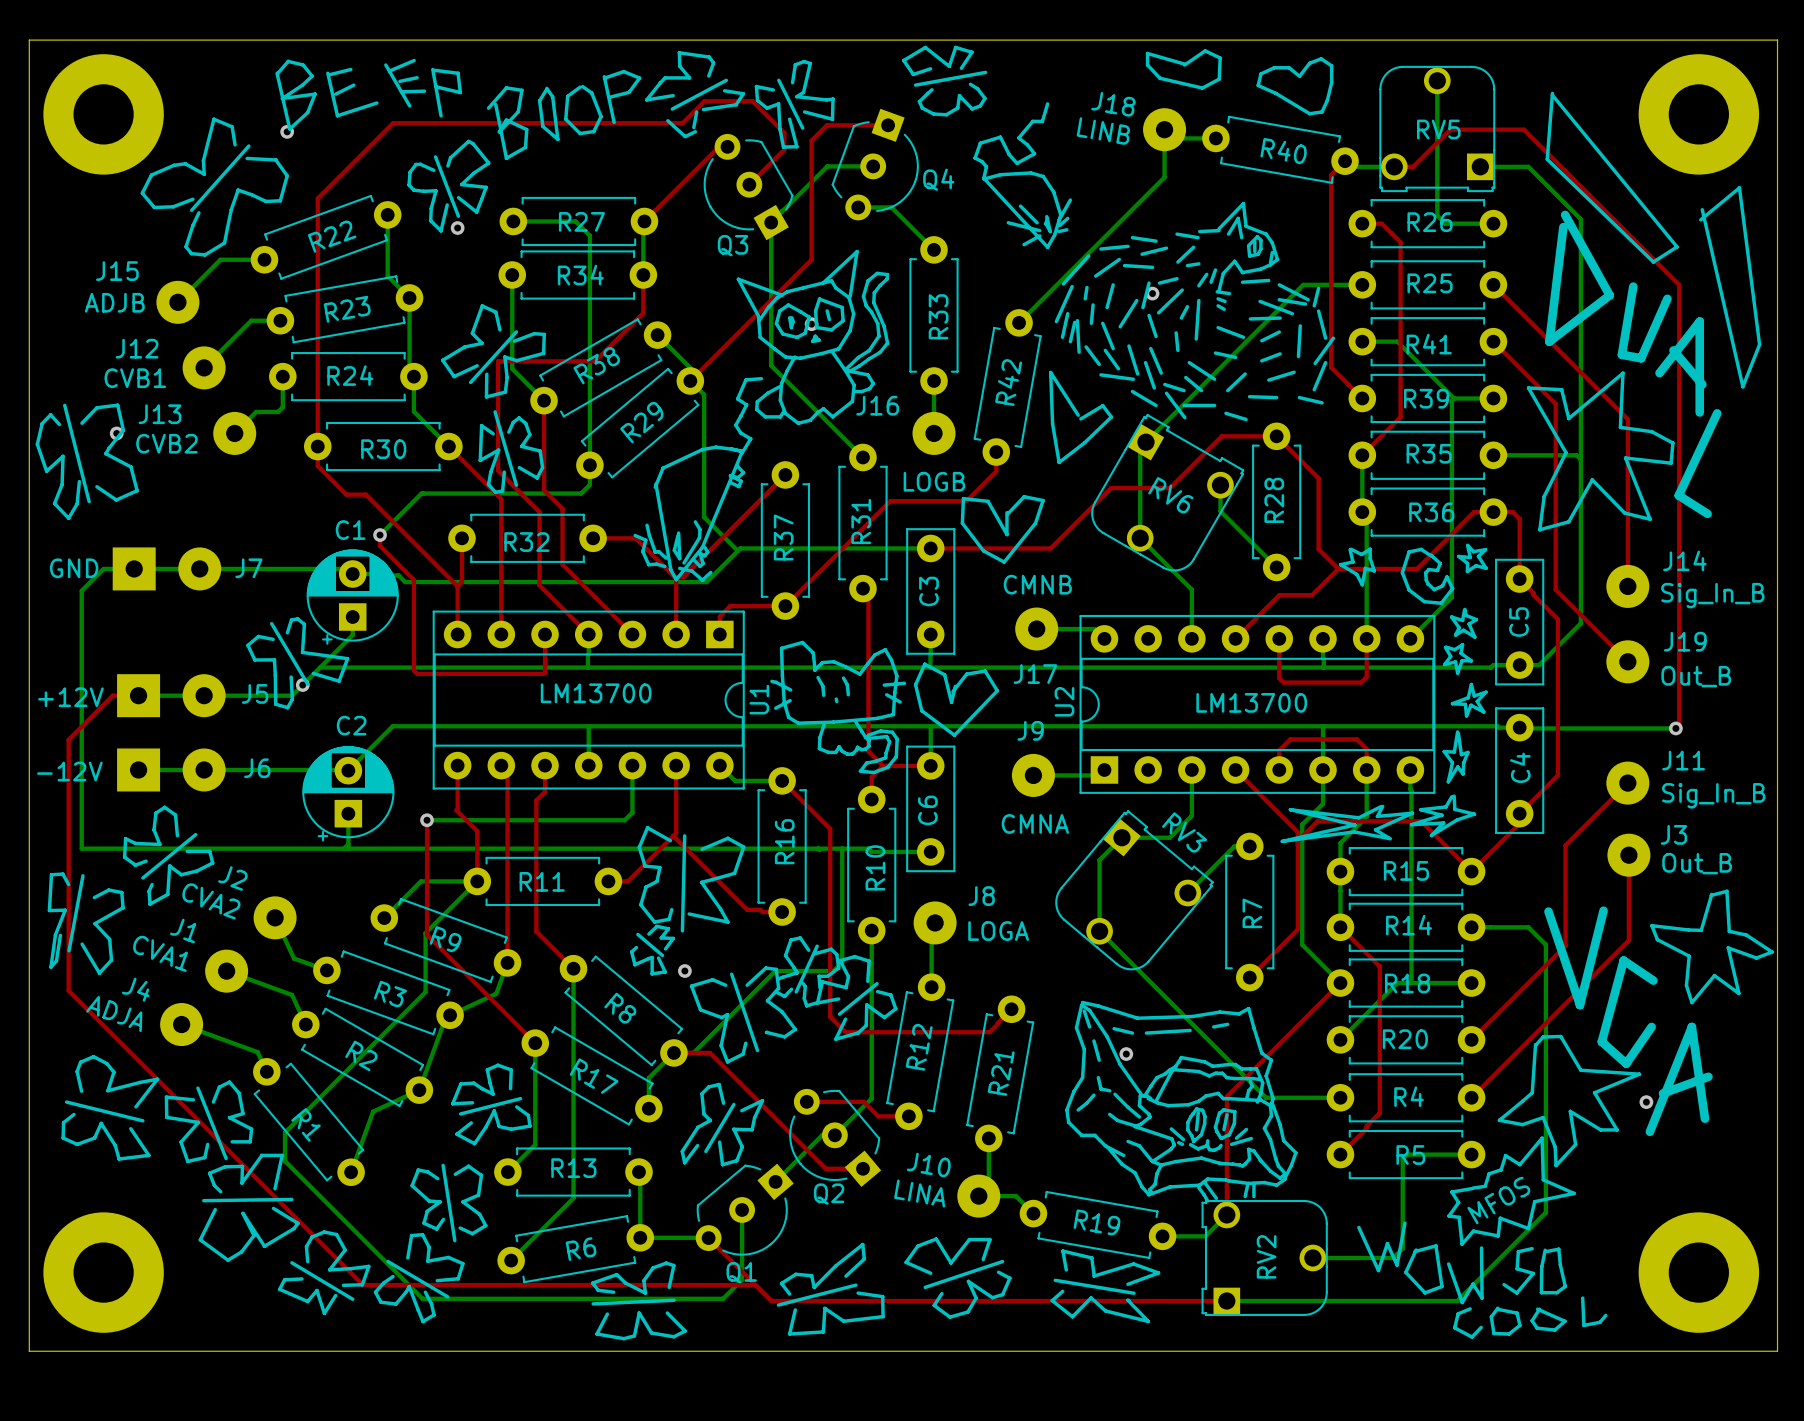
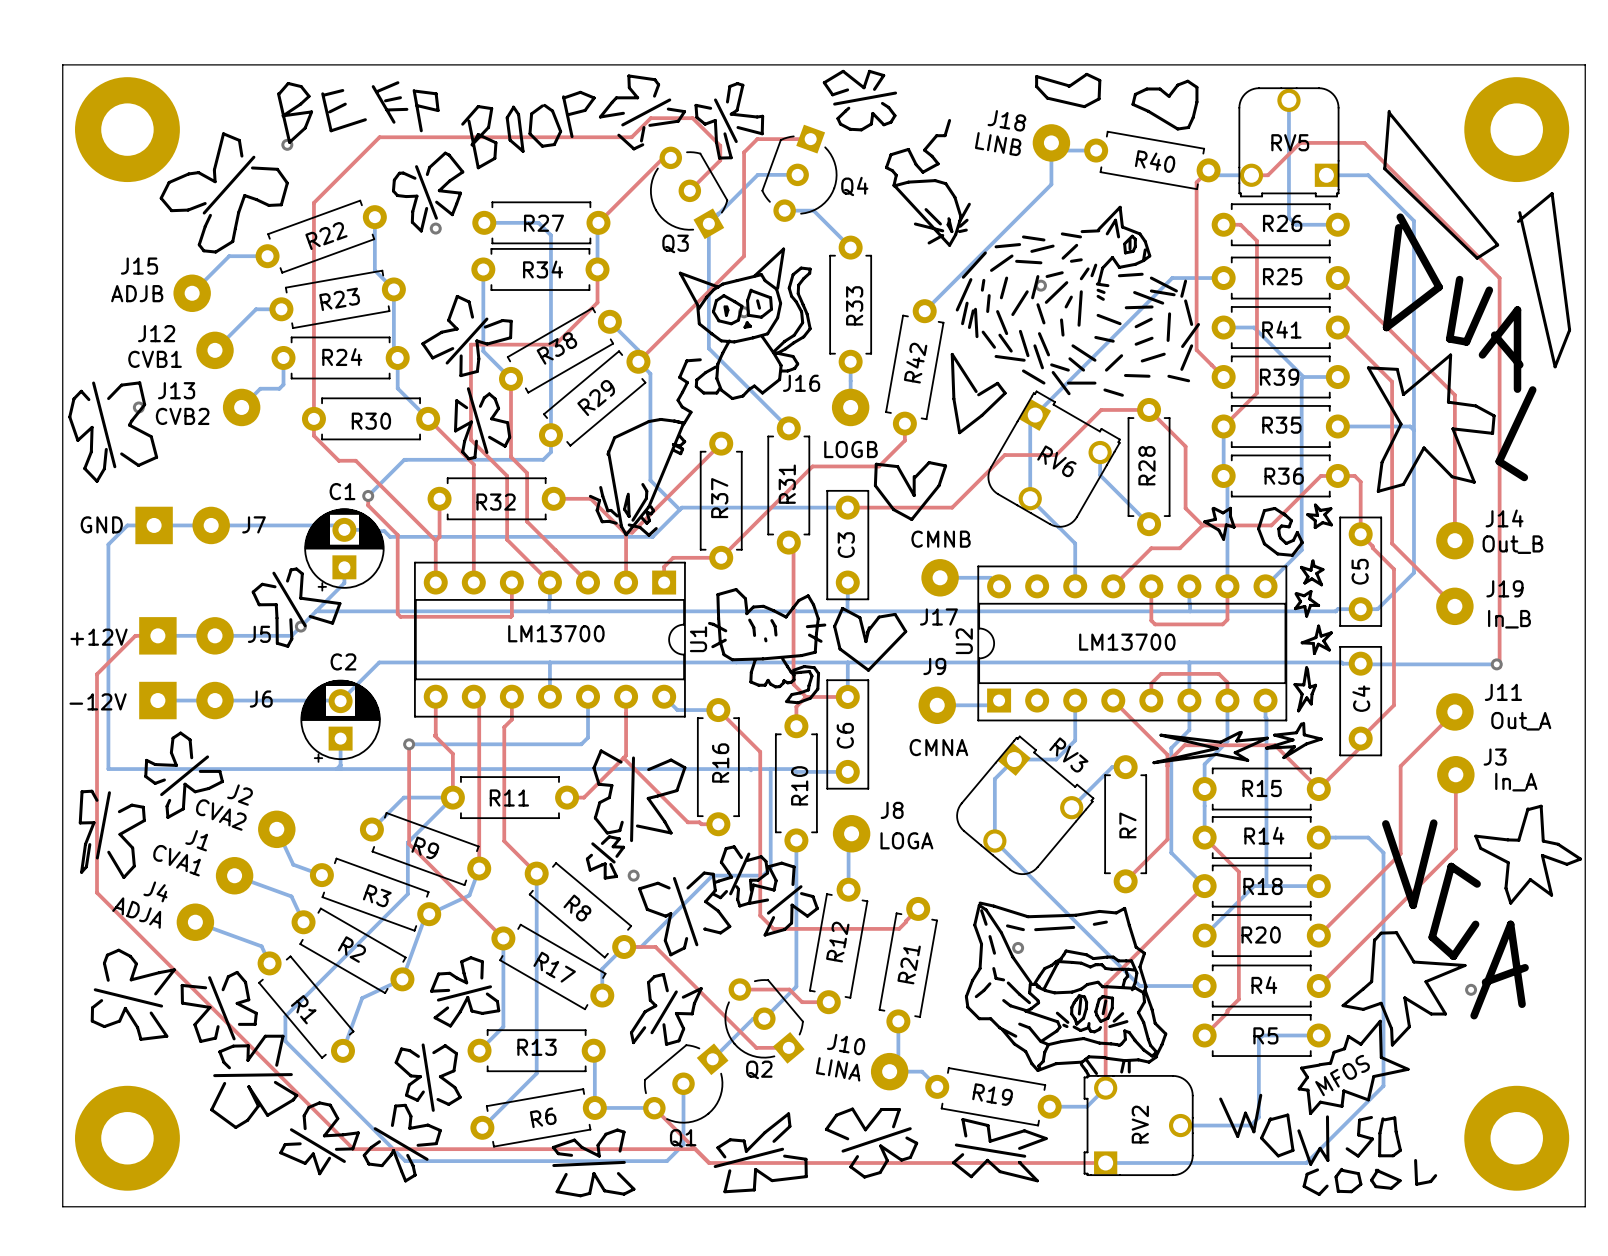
text: none -> Out_B (1512, 544)
text: Sig_In_B (1712, 595) -> none
text: Out_B (1696, 676) -> In_B (1509, 619)
text: Sig_In_B (1713, 795) -> Out_A (1521, 721)
text: Out_B (1697, 863) -> In_A (1516, 782)

